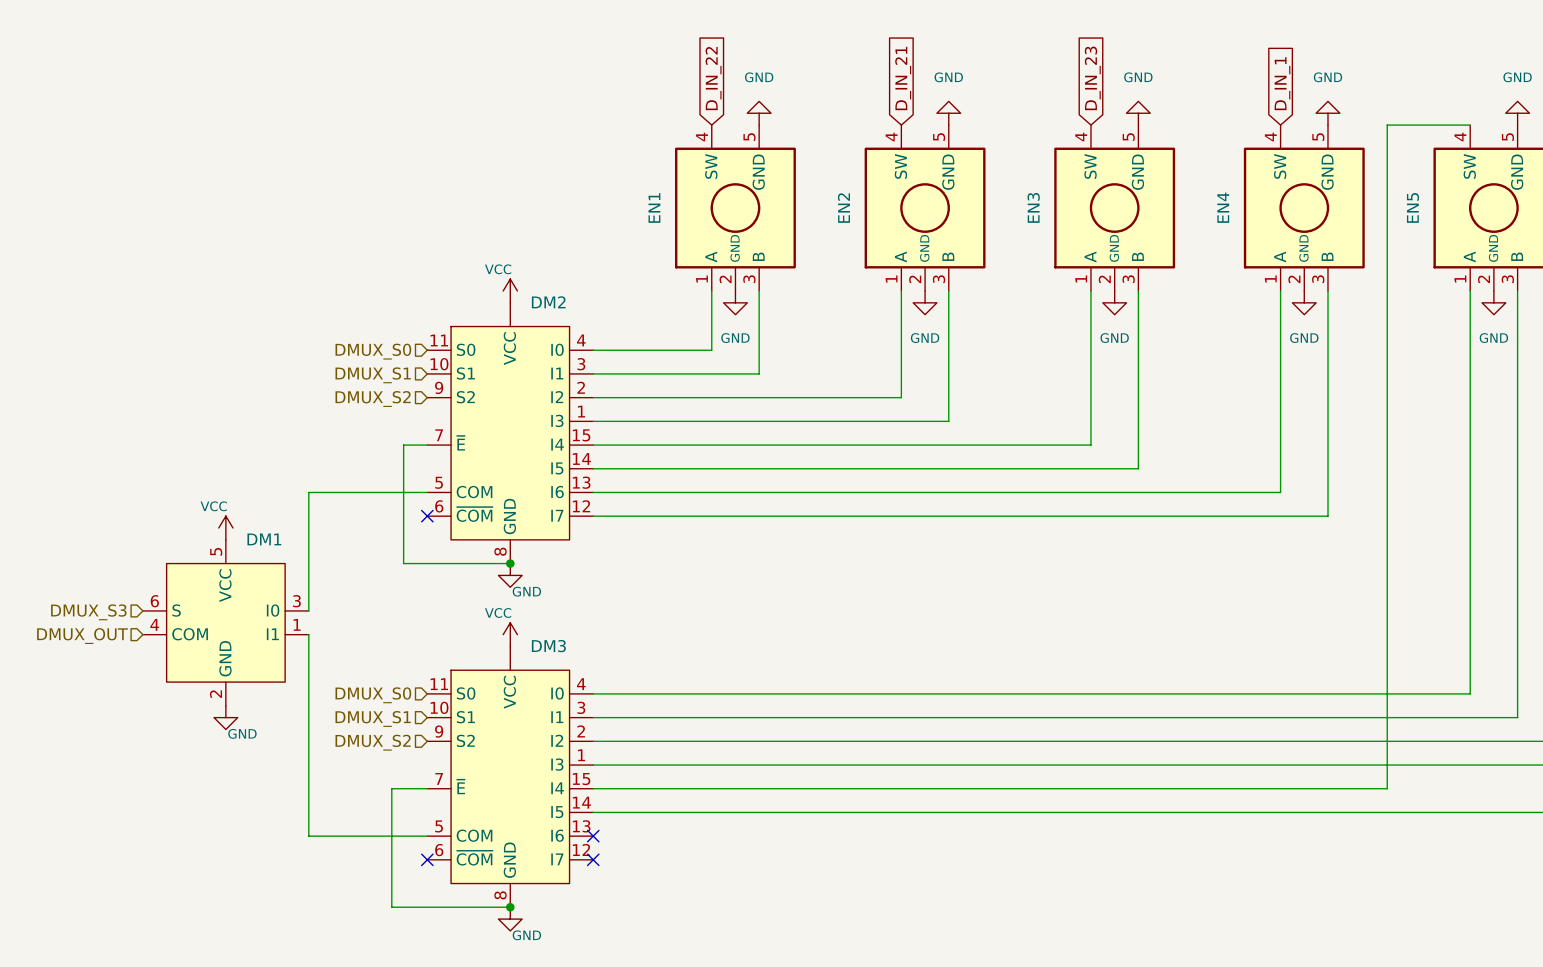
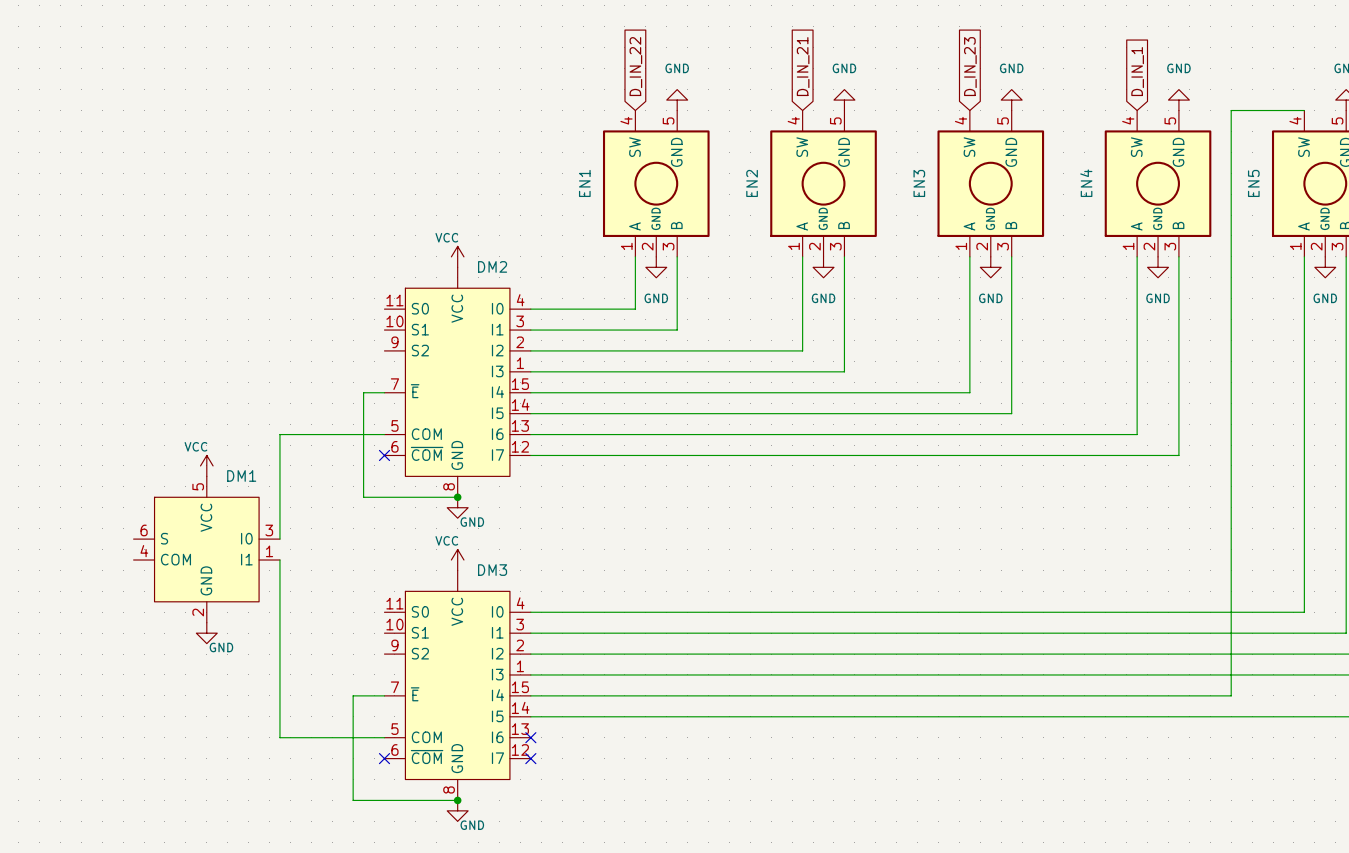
hierarchical label: DMUX_S0 (373, 351) -> none
hierarchical label: DMUX_S1 (373, 375) -> none
hierarchical label: DMUX_S2 (373, 399) -> none
hierarchical label: DMUX_S3 (88, 612) -> none
hierarchical label: DMUX_OUT (82, 636) -> none
hierarchical label: DMUX_S0 (373, 695) -> none
hierarchical label: DMUX_S1 (373, 718) -> none
hierarchical label: DMUX_S2 (373, 742) -> none

